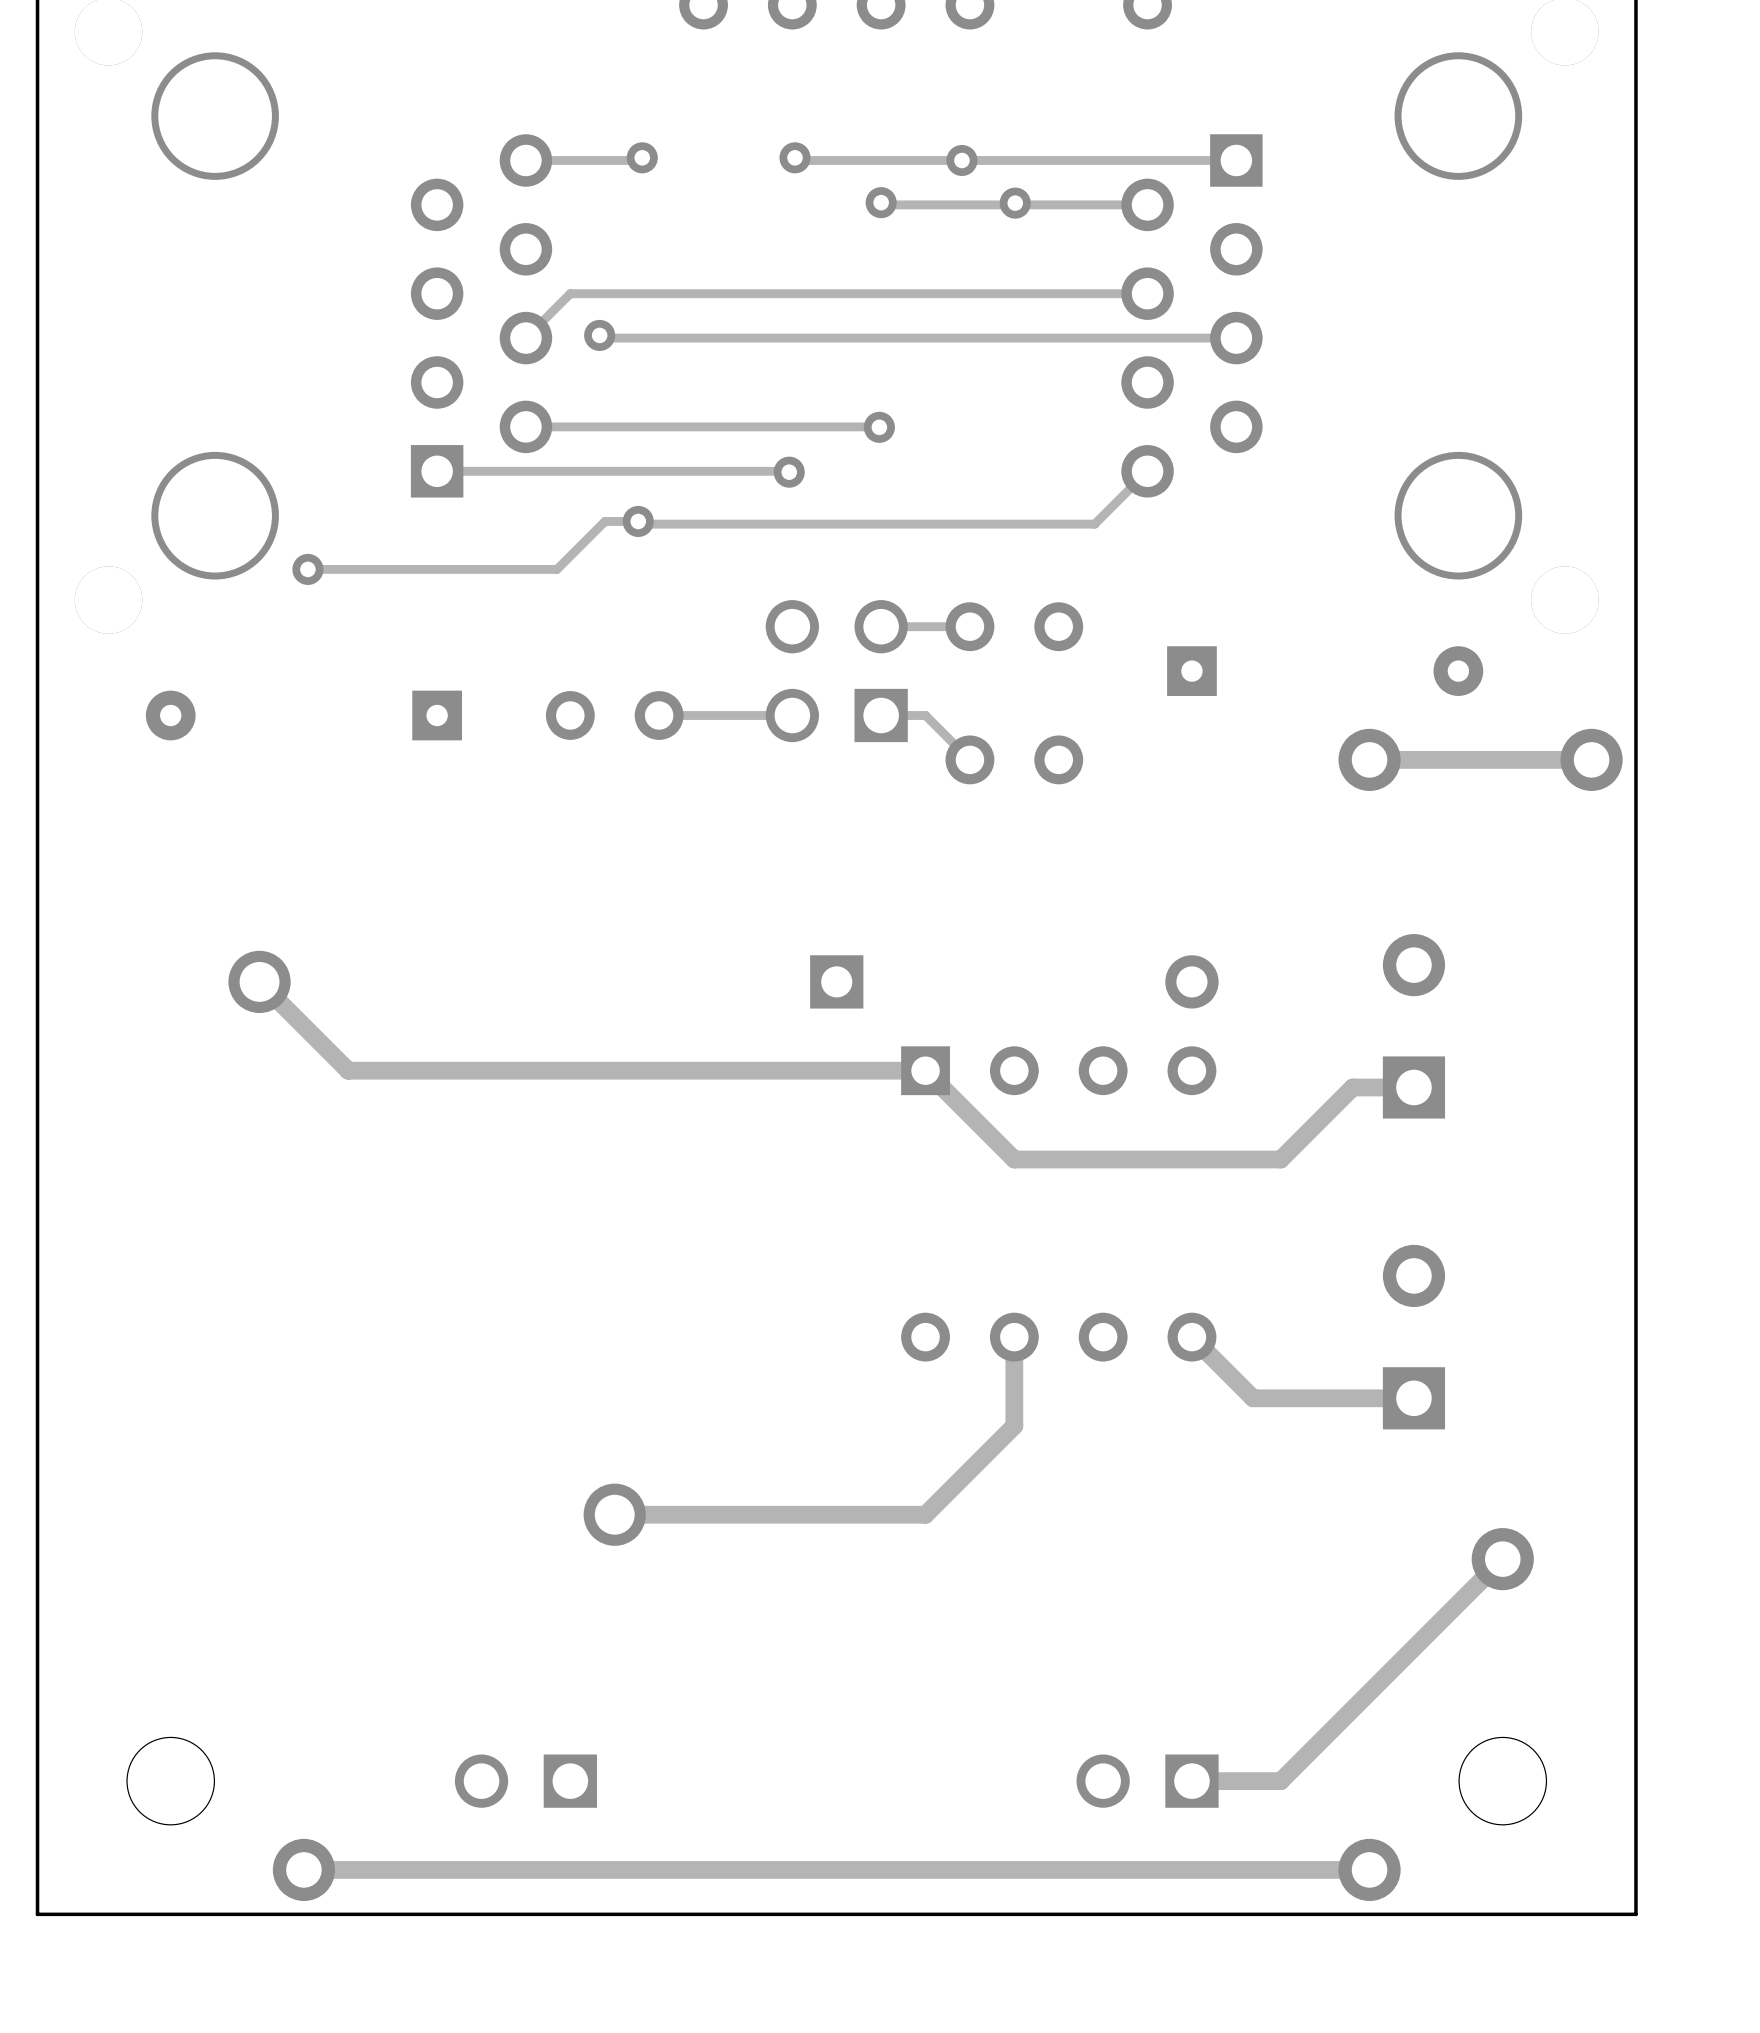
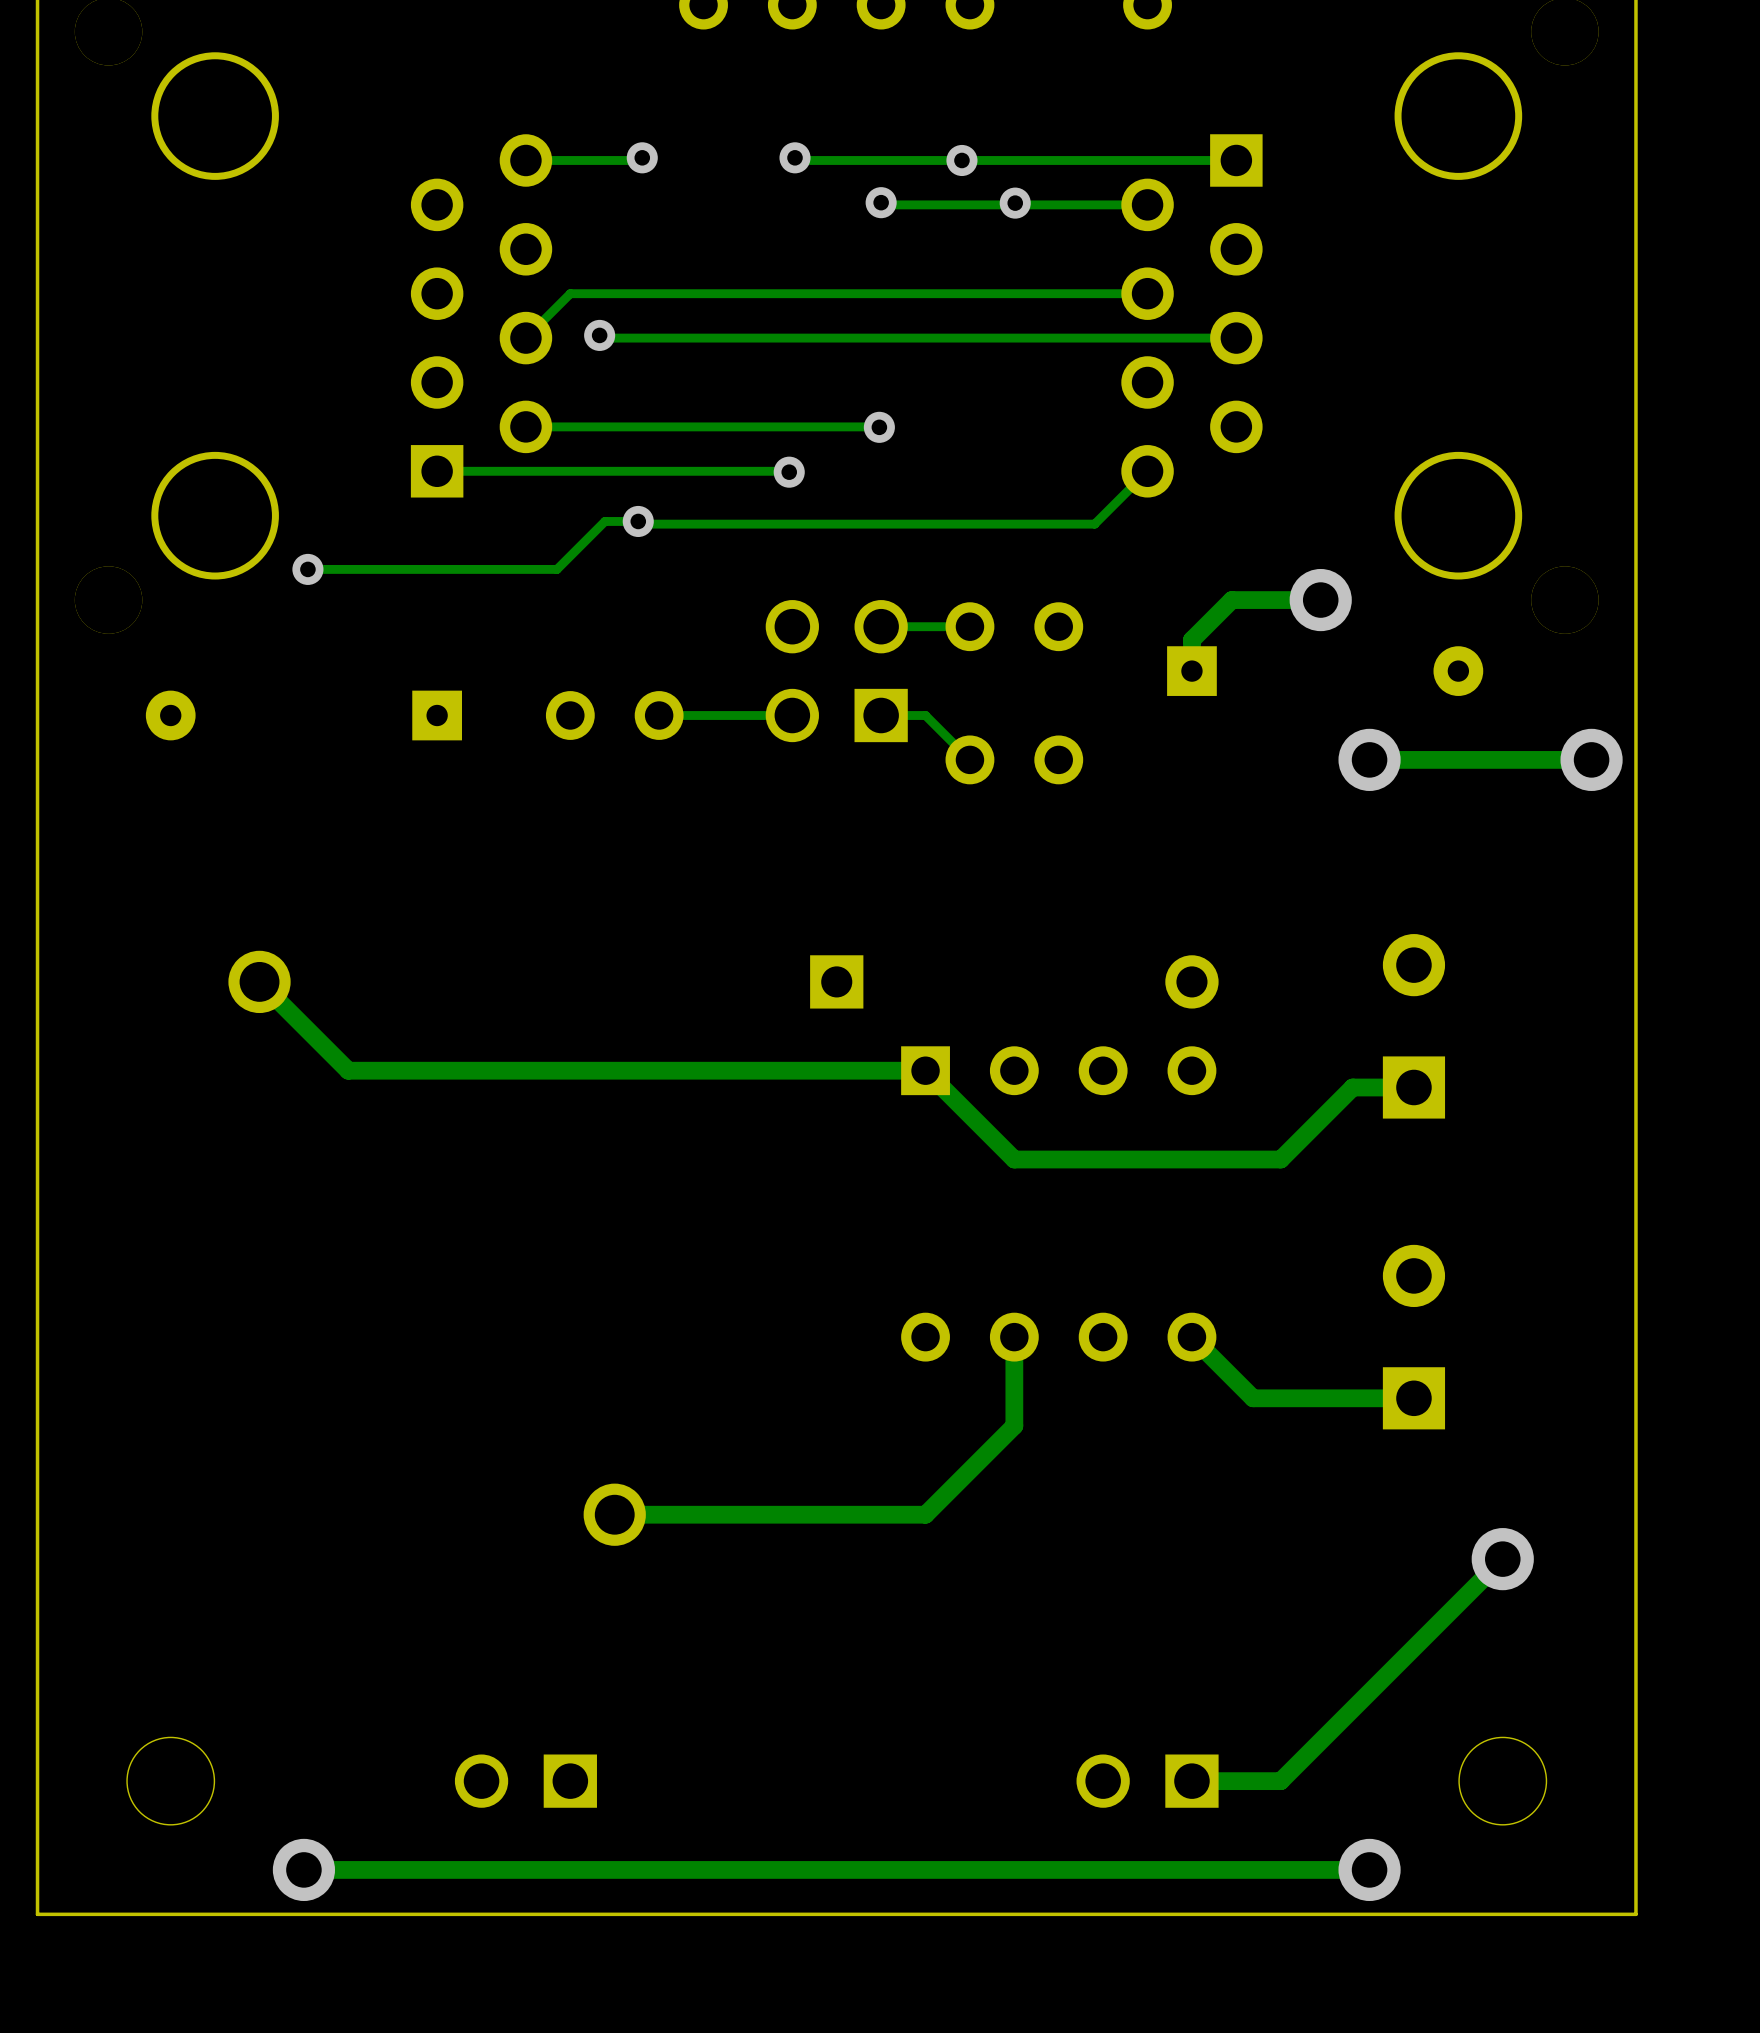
track: none -> (1320, 600) (1231, 600) (1191, 640) (1191, 671)
via: none -> (1320, 600)

